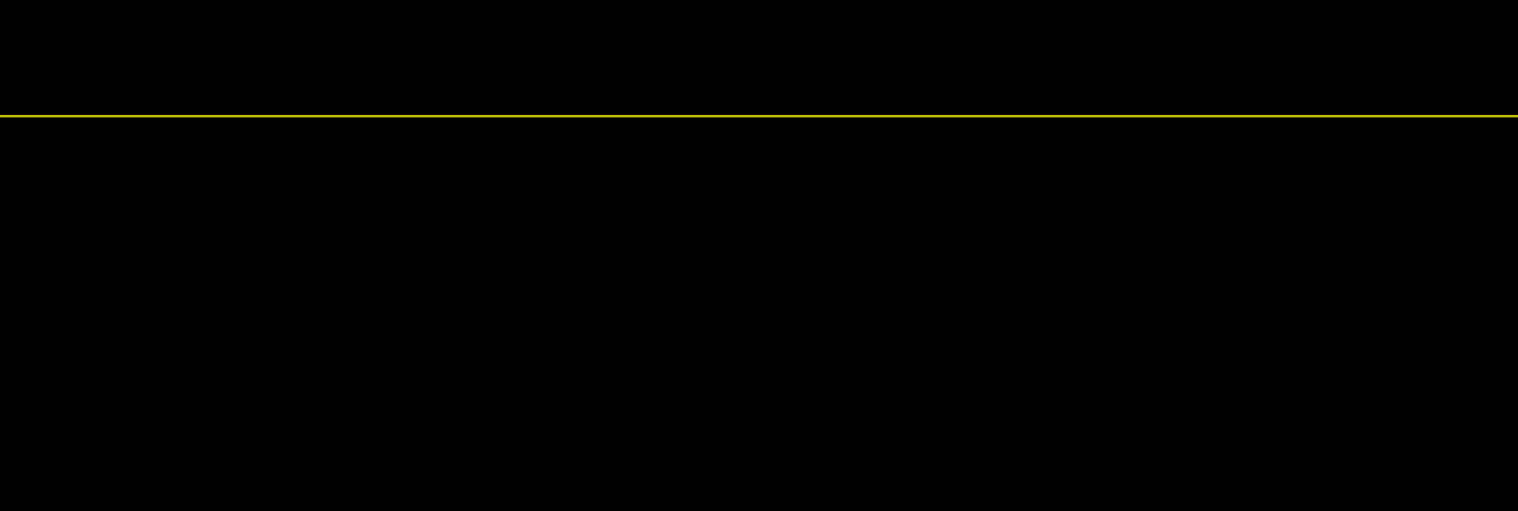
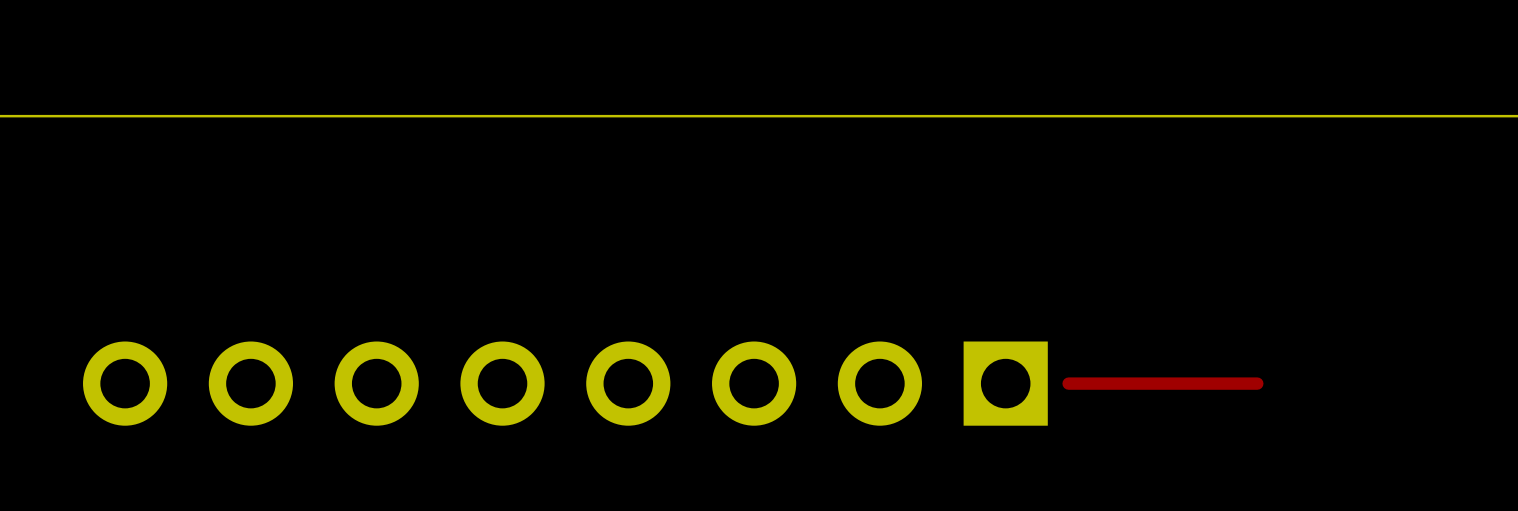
part: none -> (565, 383)
top track: none -> (1257, 383) (1068, 383)

